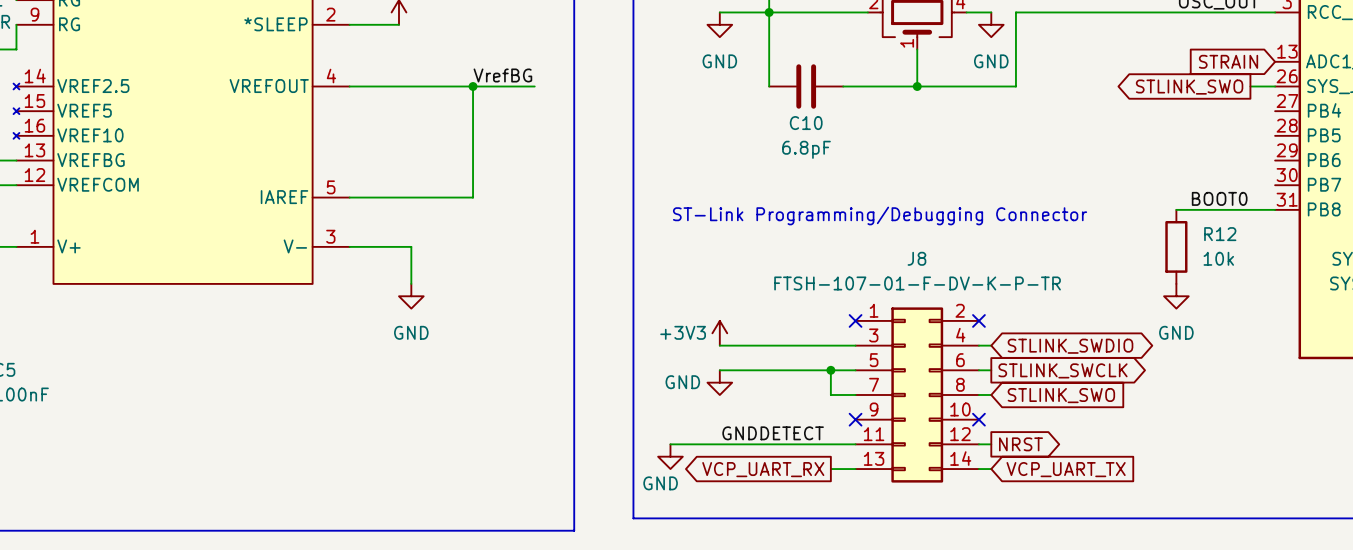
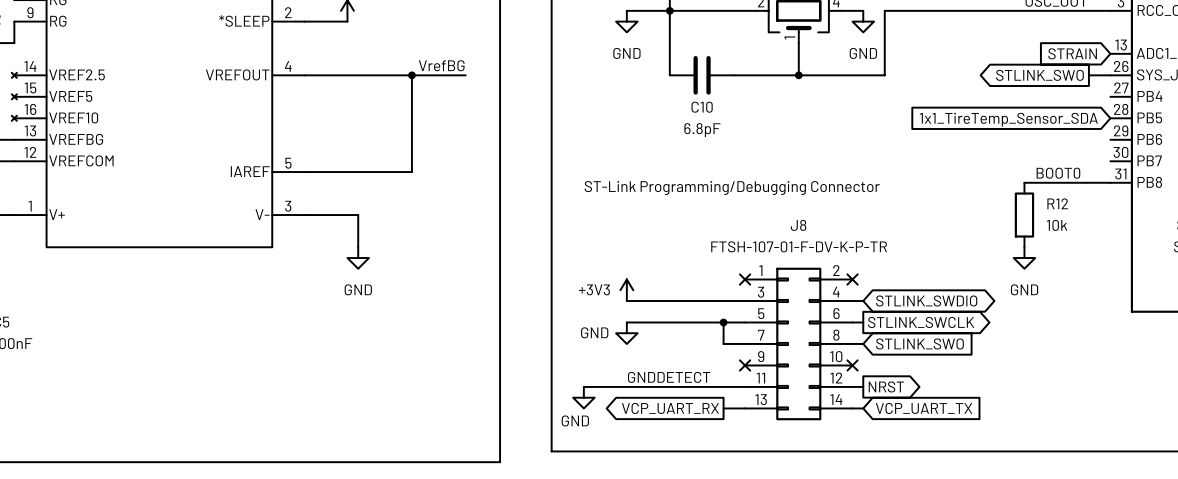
global label: none -> 1x1_TireTemp_Sensor_SDA (1008, 119)

